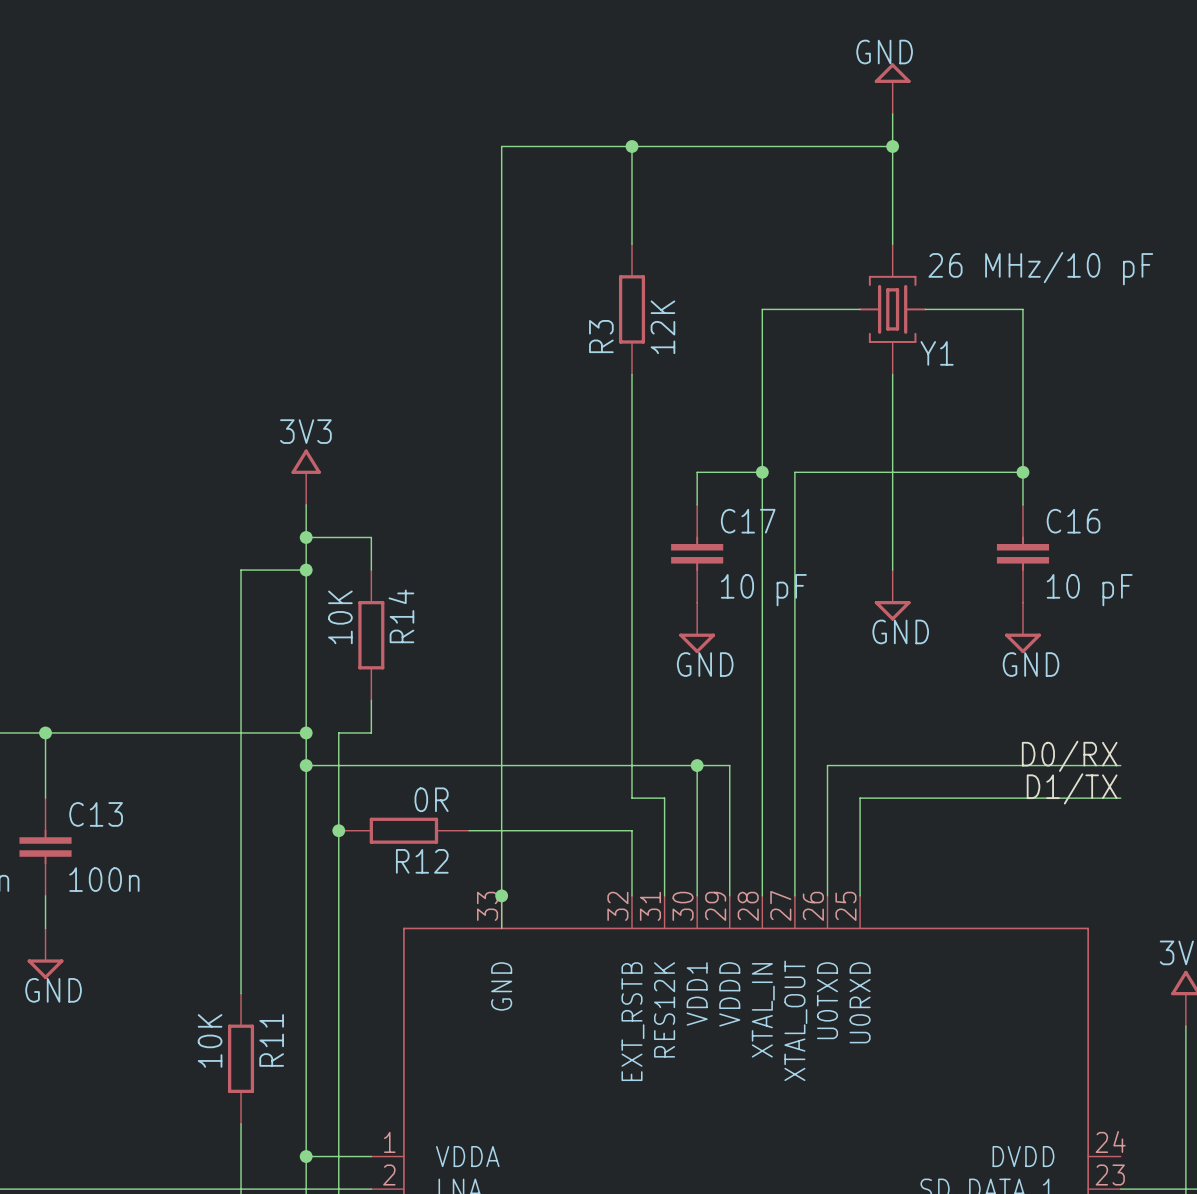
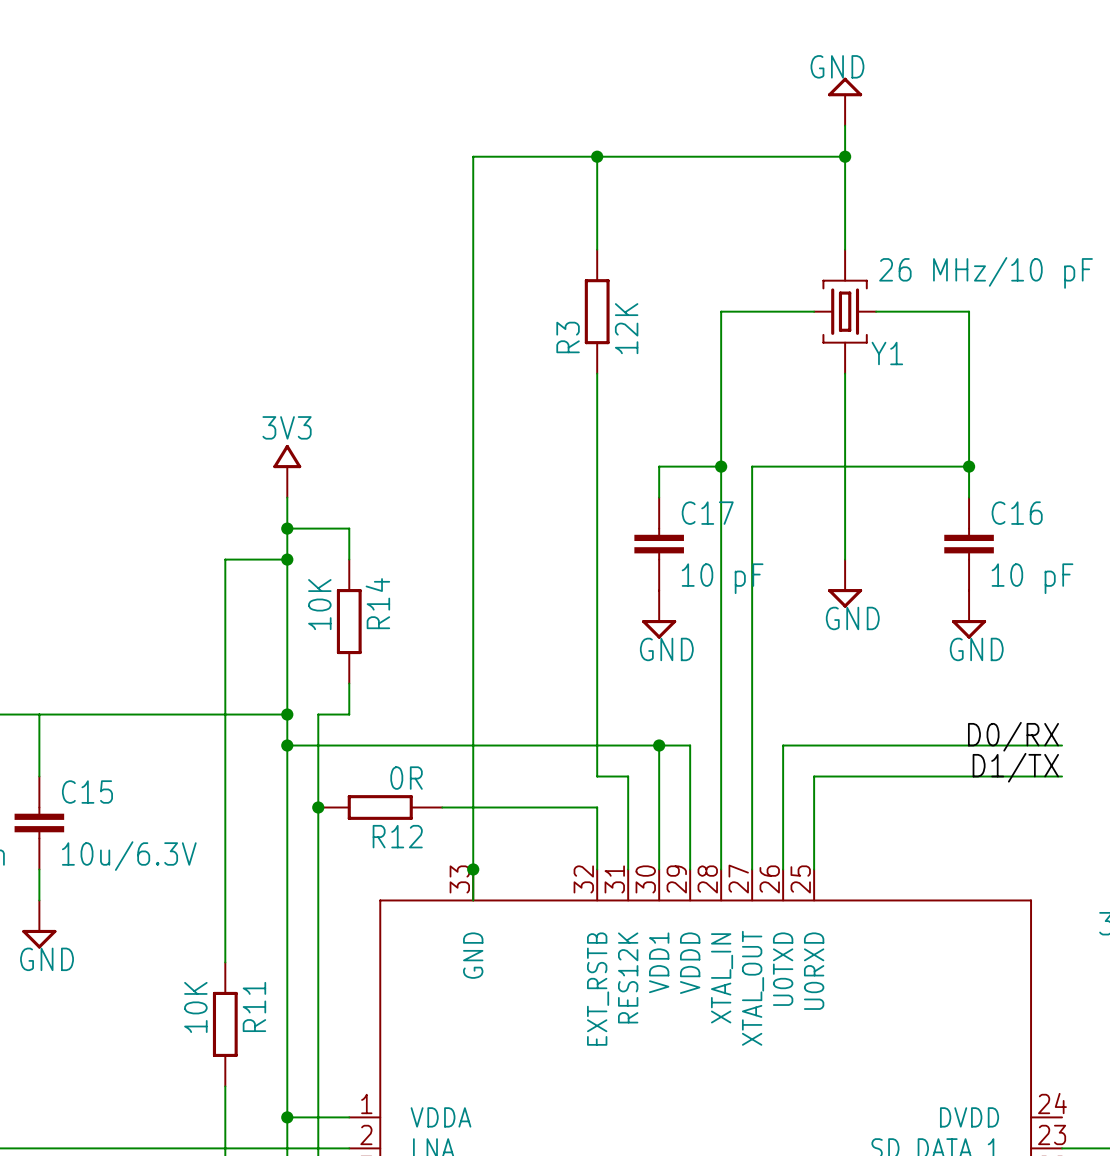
junction: (45, 732) -> none
C13 name: C13 (96, 814) -> C15 (87, 792)
C13 value: 100n (104, 879) -> 10u/6.3V (129, 856)

